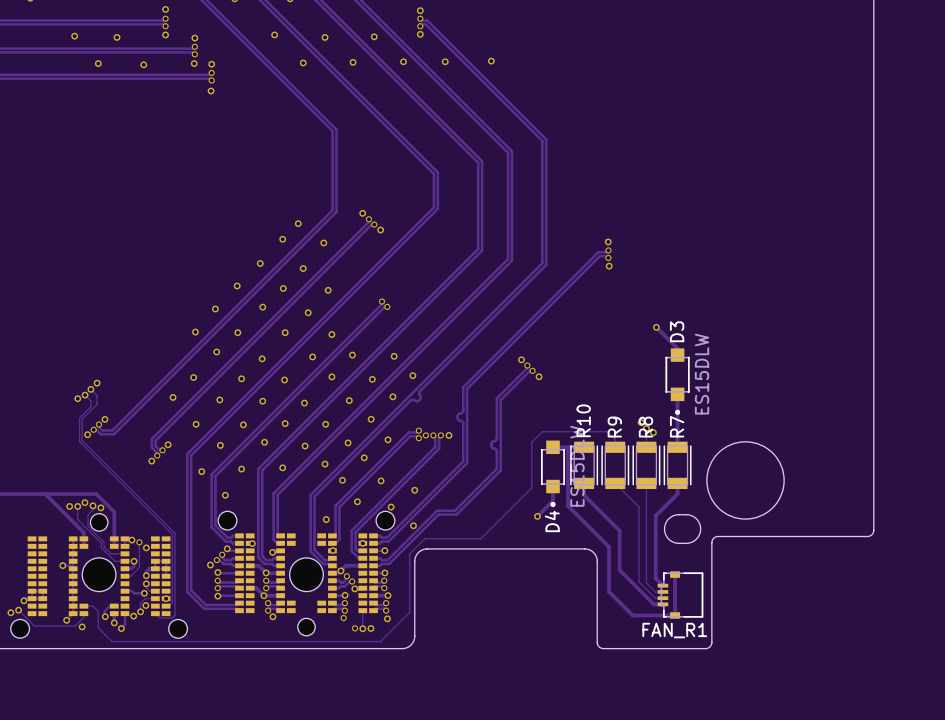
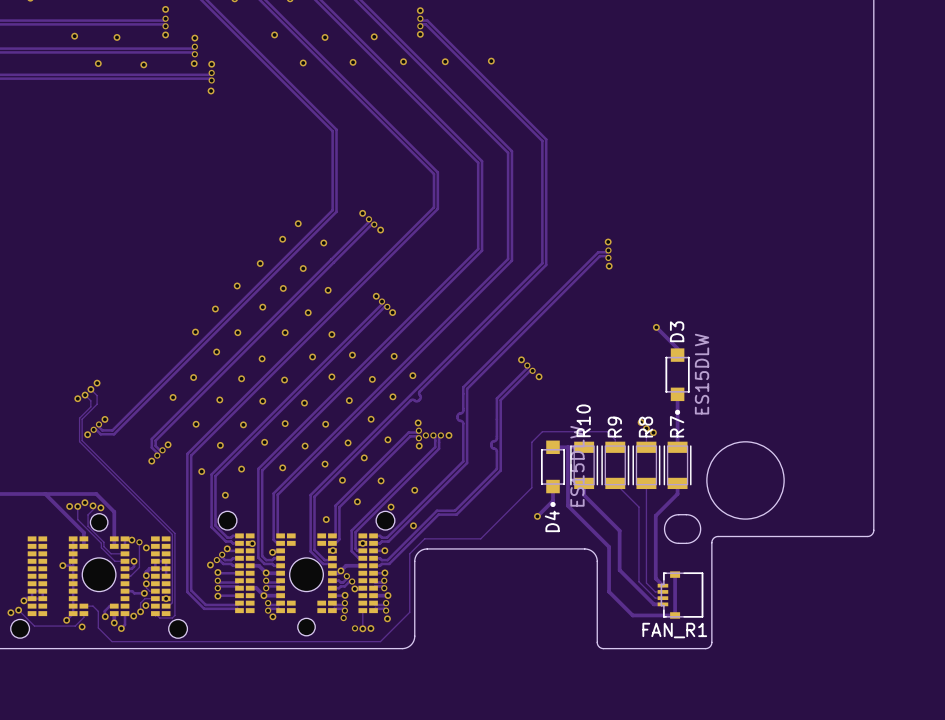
via: none -> (376, 296)
via: none -> (392, 312)
via: none -> (418, 422)
via: none -> (419, 446)

